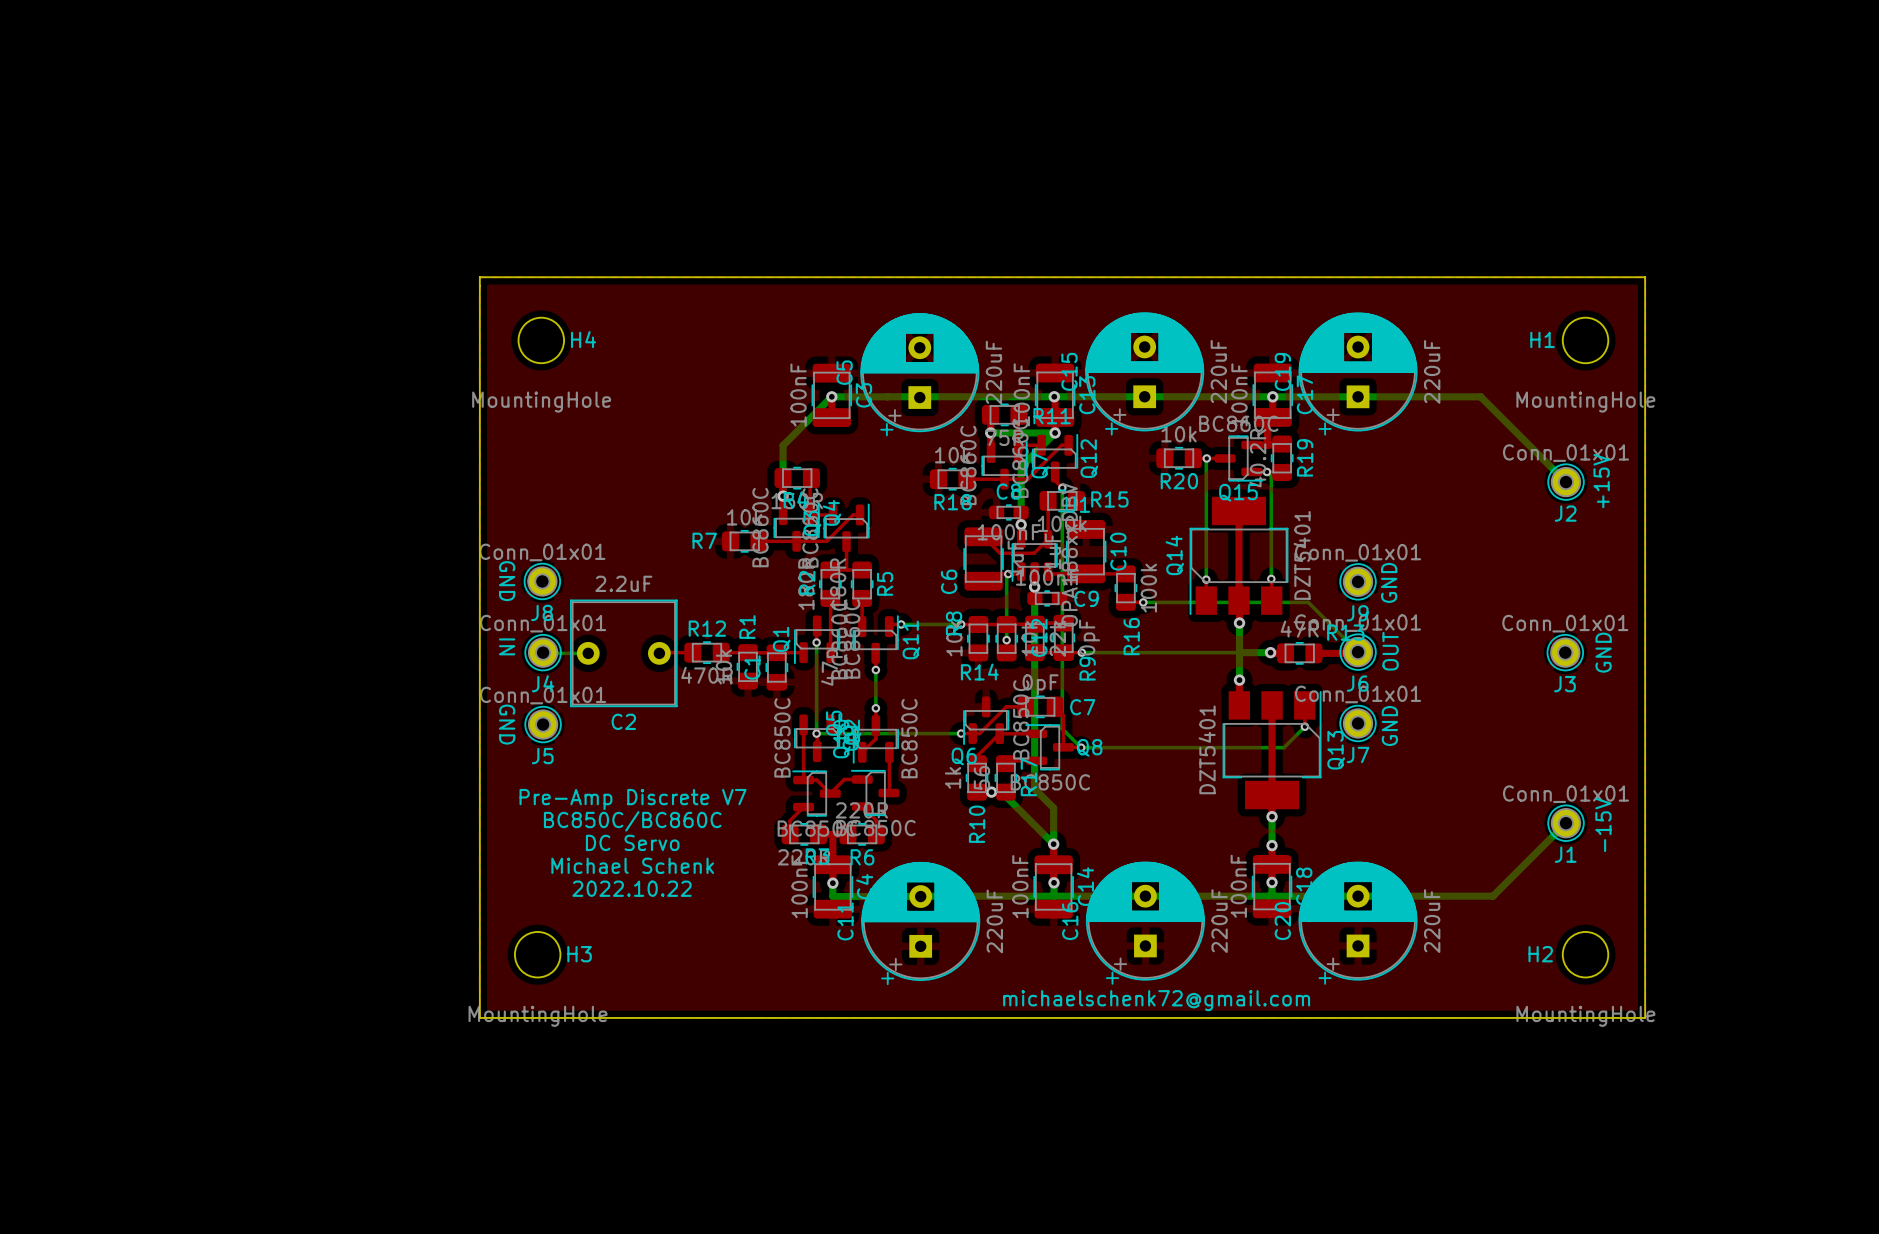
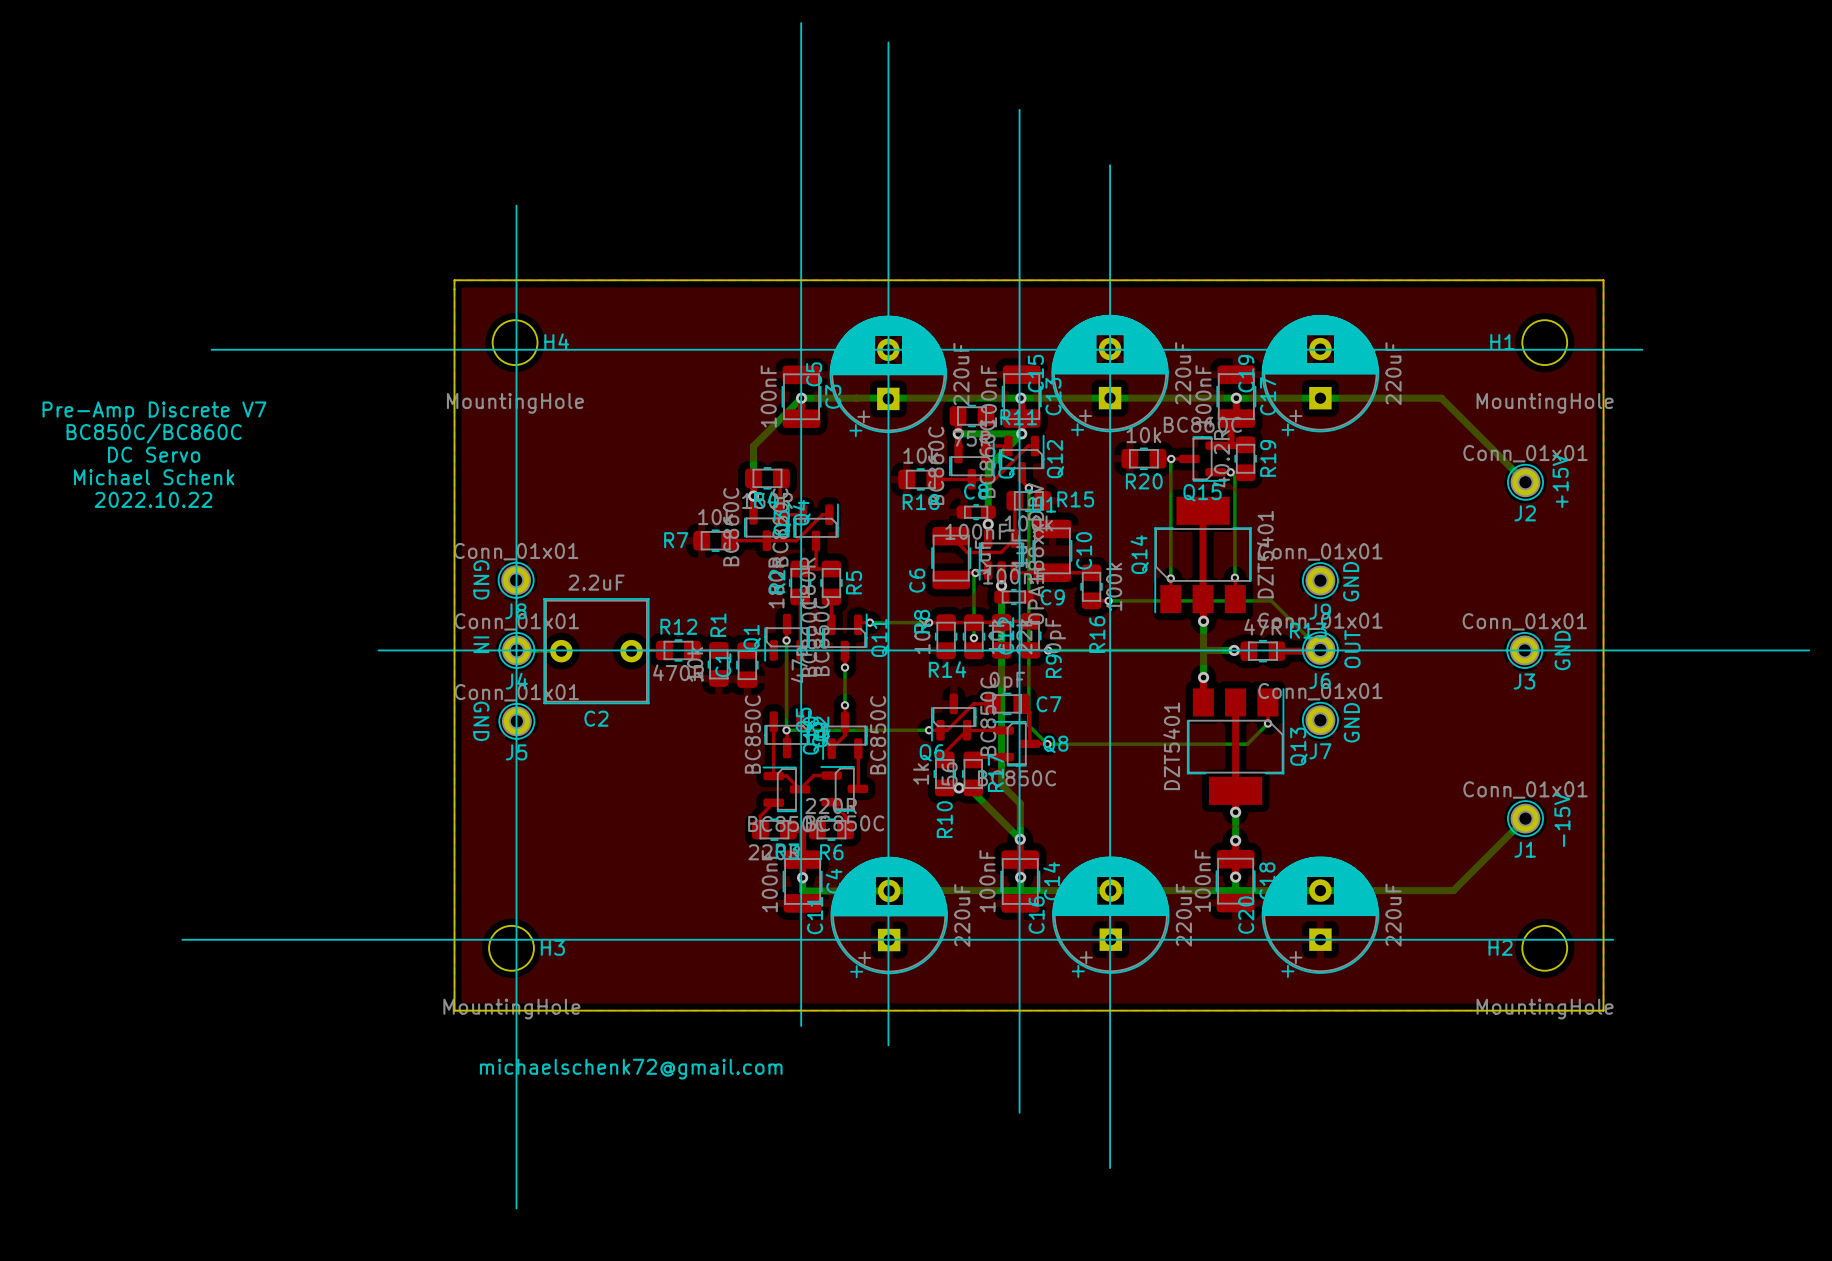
line: none -> (801, 23) (801, 1025)
line: none -> (888, 42) (888, 1045)
line: none -> (1019, 109) (1019, 1112)
line: none -> (1110, 165) (1110, 1168)
line: none -> (516, 205) (516, 1208)
line: none -> (211, 349) (1642, 349)
text: none -> Pre-Amp Discrete V7 (154, 411)
text: none -> BC850C/BC860C (154, 433)
text: none -> DC Servo (154, 454)
text: none -> Michael Schenk (154, 477)
text: none -> 2022.10.22 (153, 499)
line: none -> (378, 650) (1809, 650)
text: Pre-Amp Discrete V7 (633, 799) -> none
text: BC850C/BC860C (632, 821) -> none
text: DC Servo (632, 842) -> none
text: Michael Schenk (632, 865) -> none
text: 2022.10.22 (632, 888) -> none
line: none -> (182, 939) (1613, 939)
text: michaelschenk72@gmail.com (1156, 1000) -> none
text: none -> michaelschenk72@gmail.com (631, 1069)

